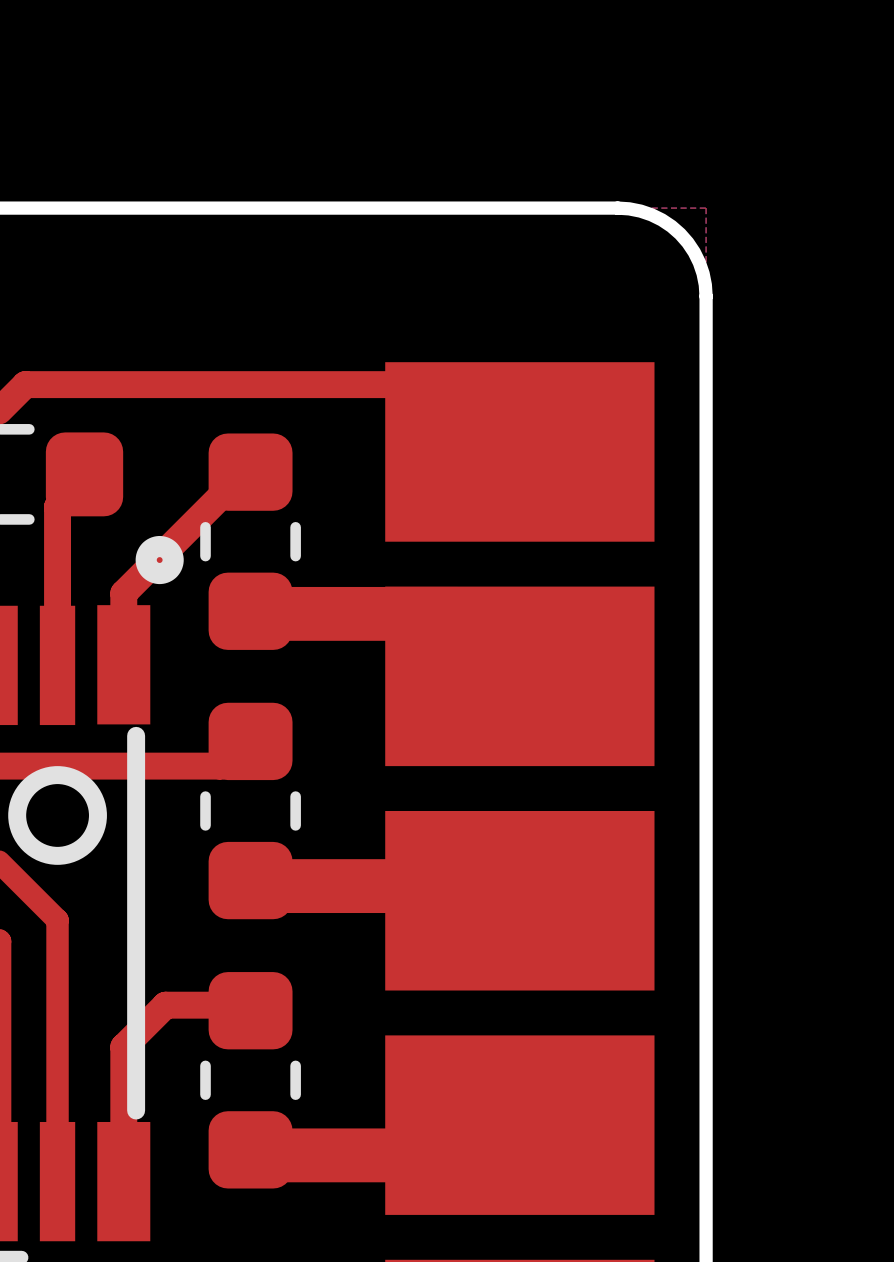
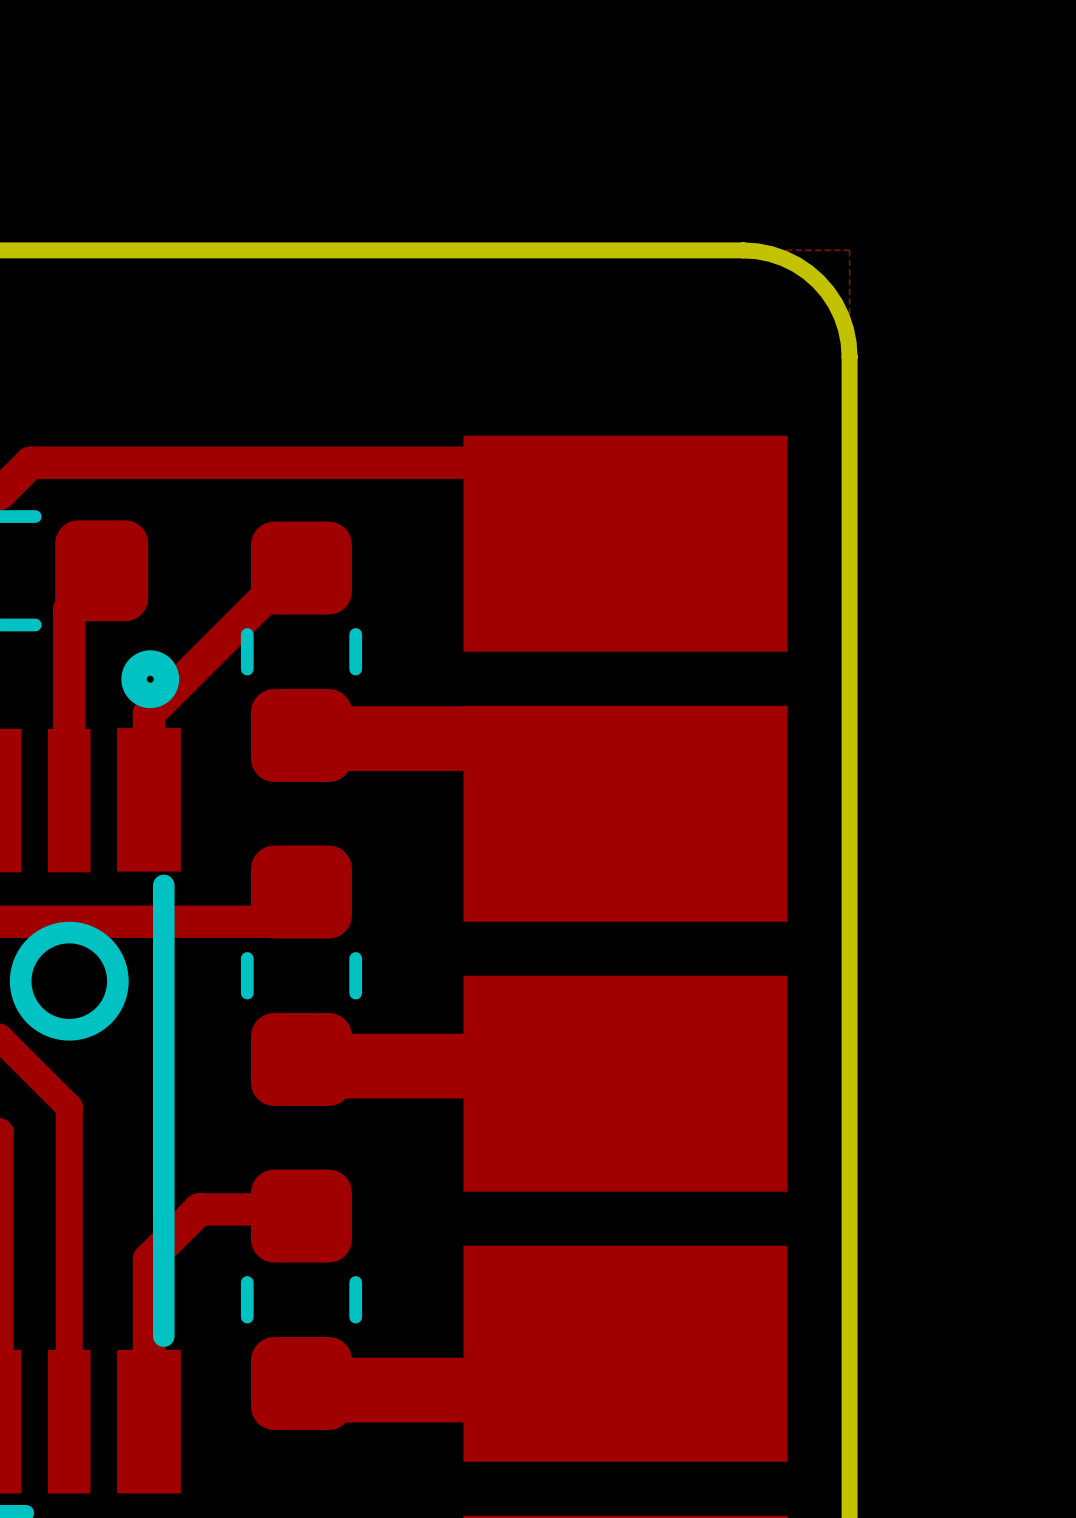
drawing position: (159, 560) -> (150, 679)

